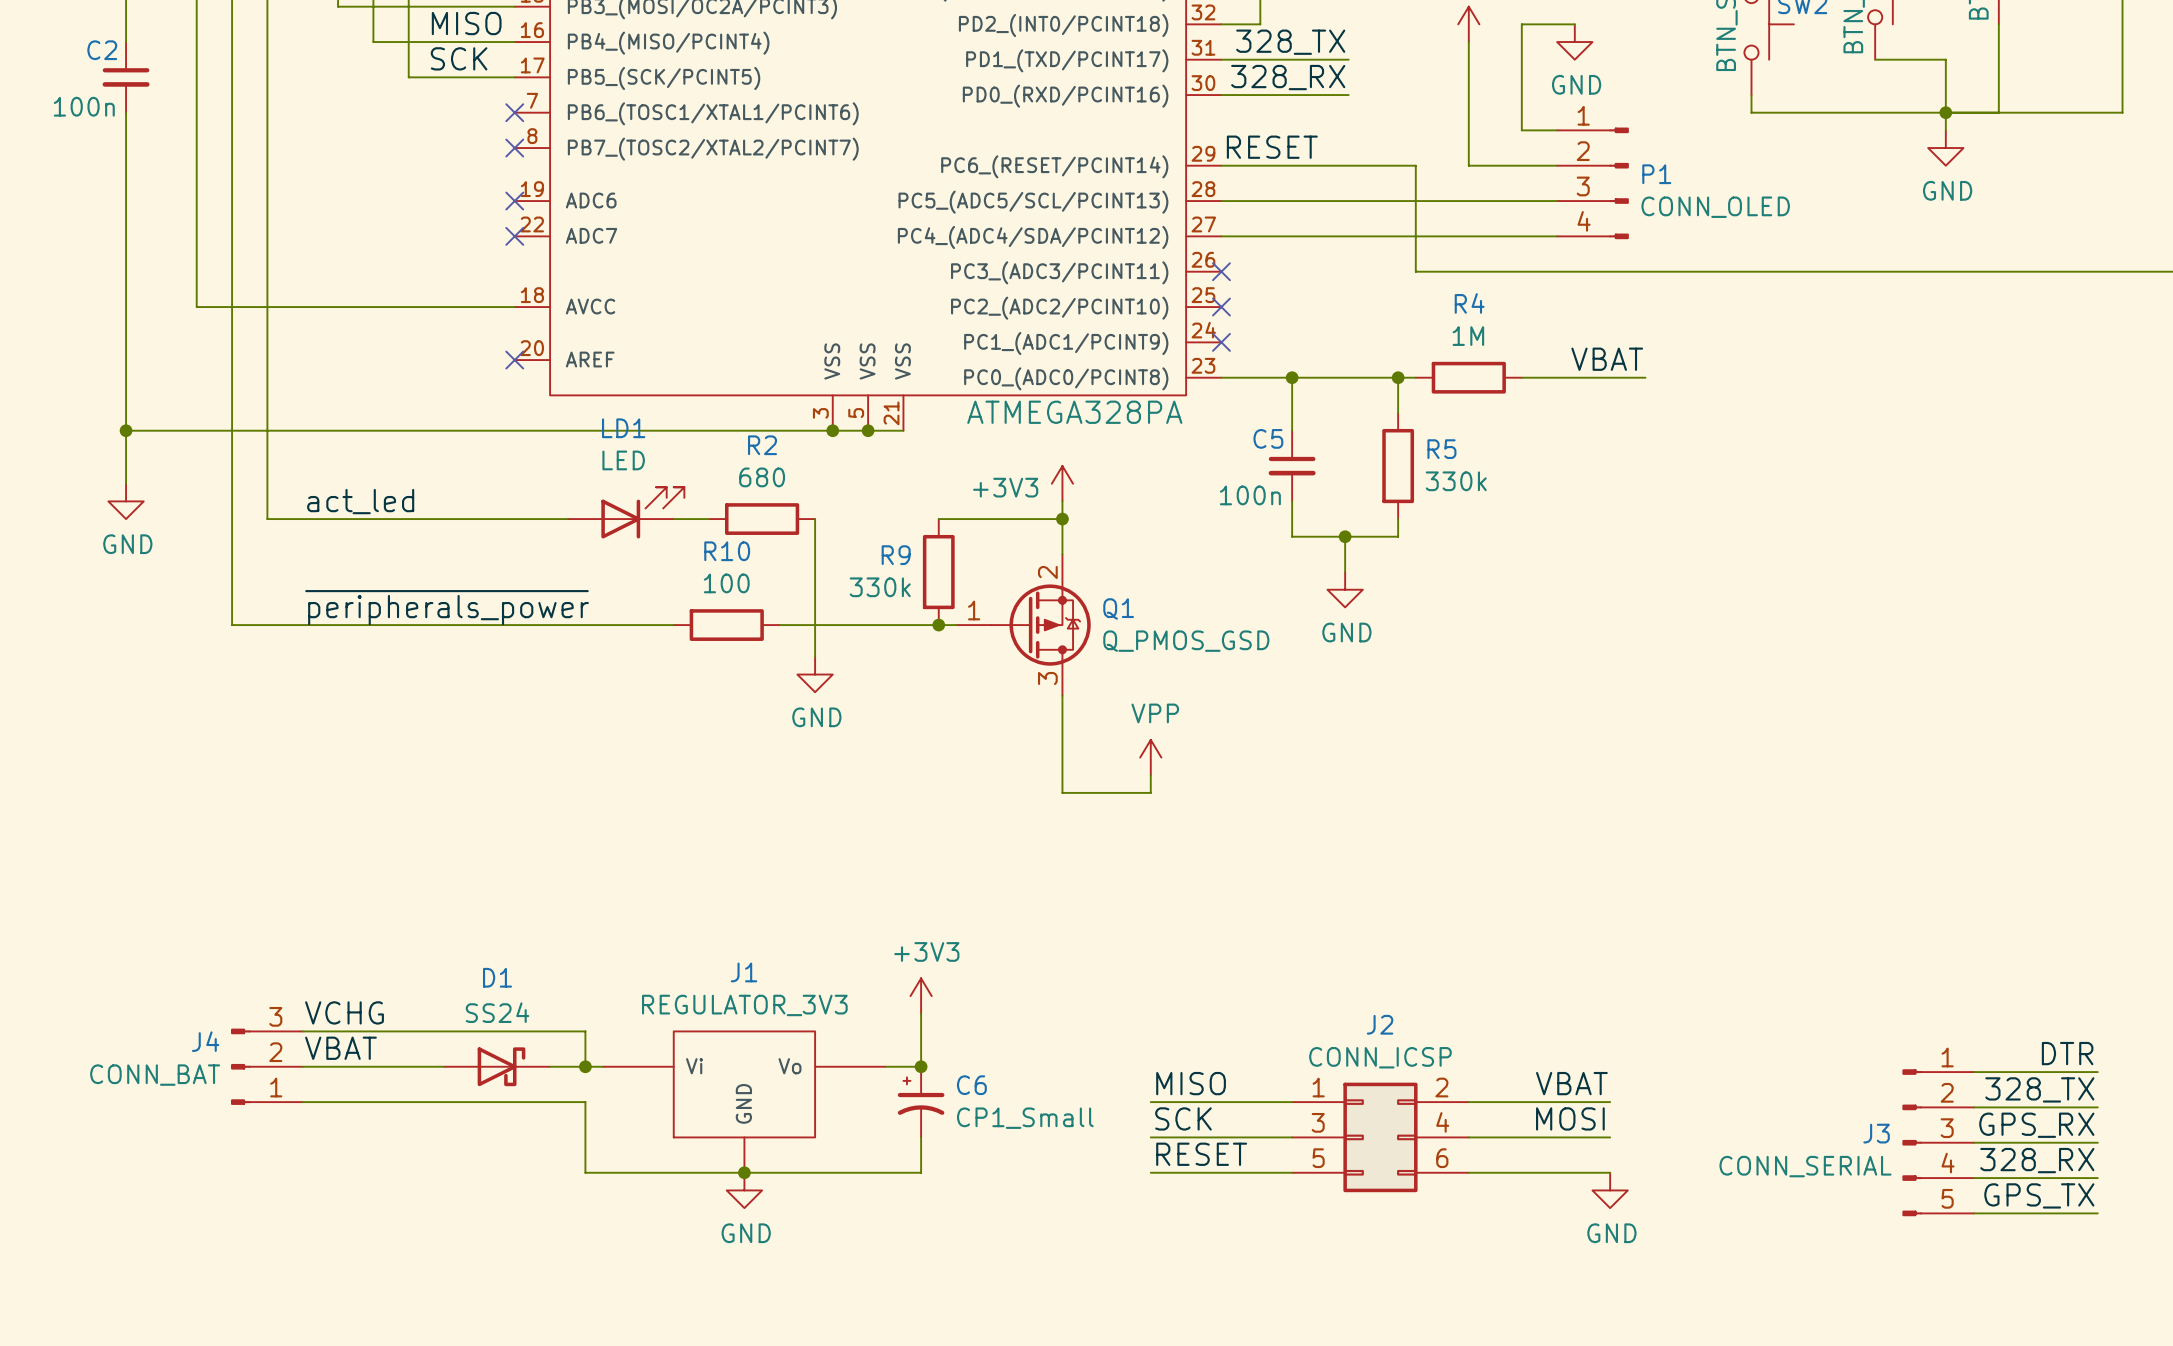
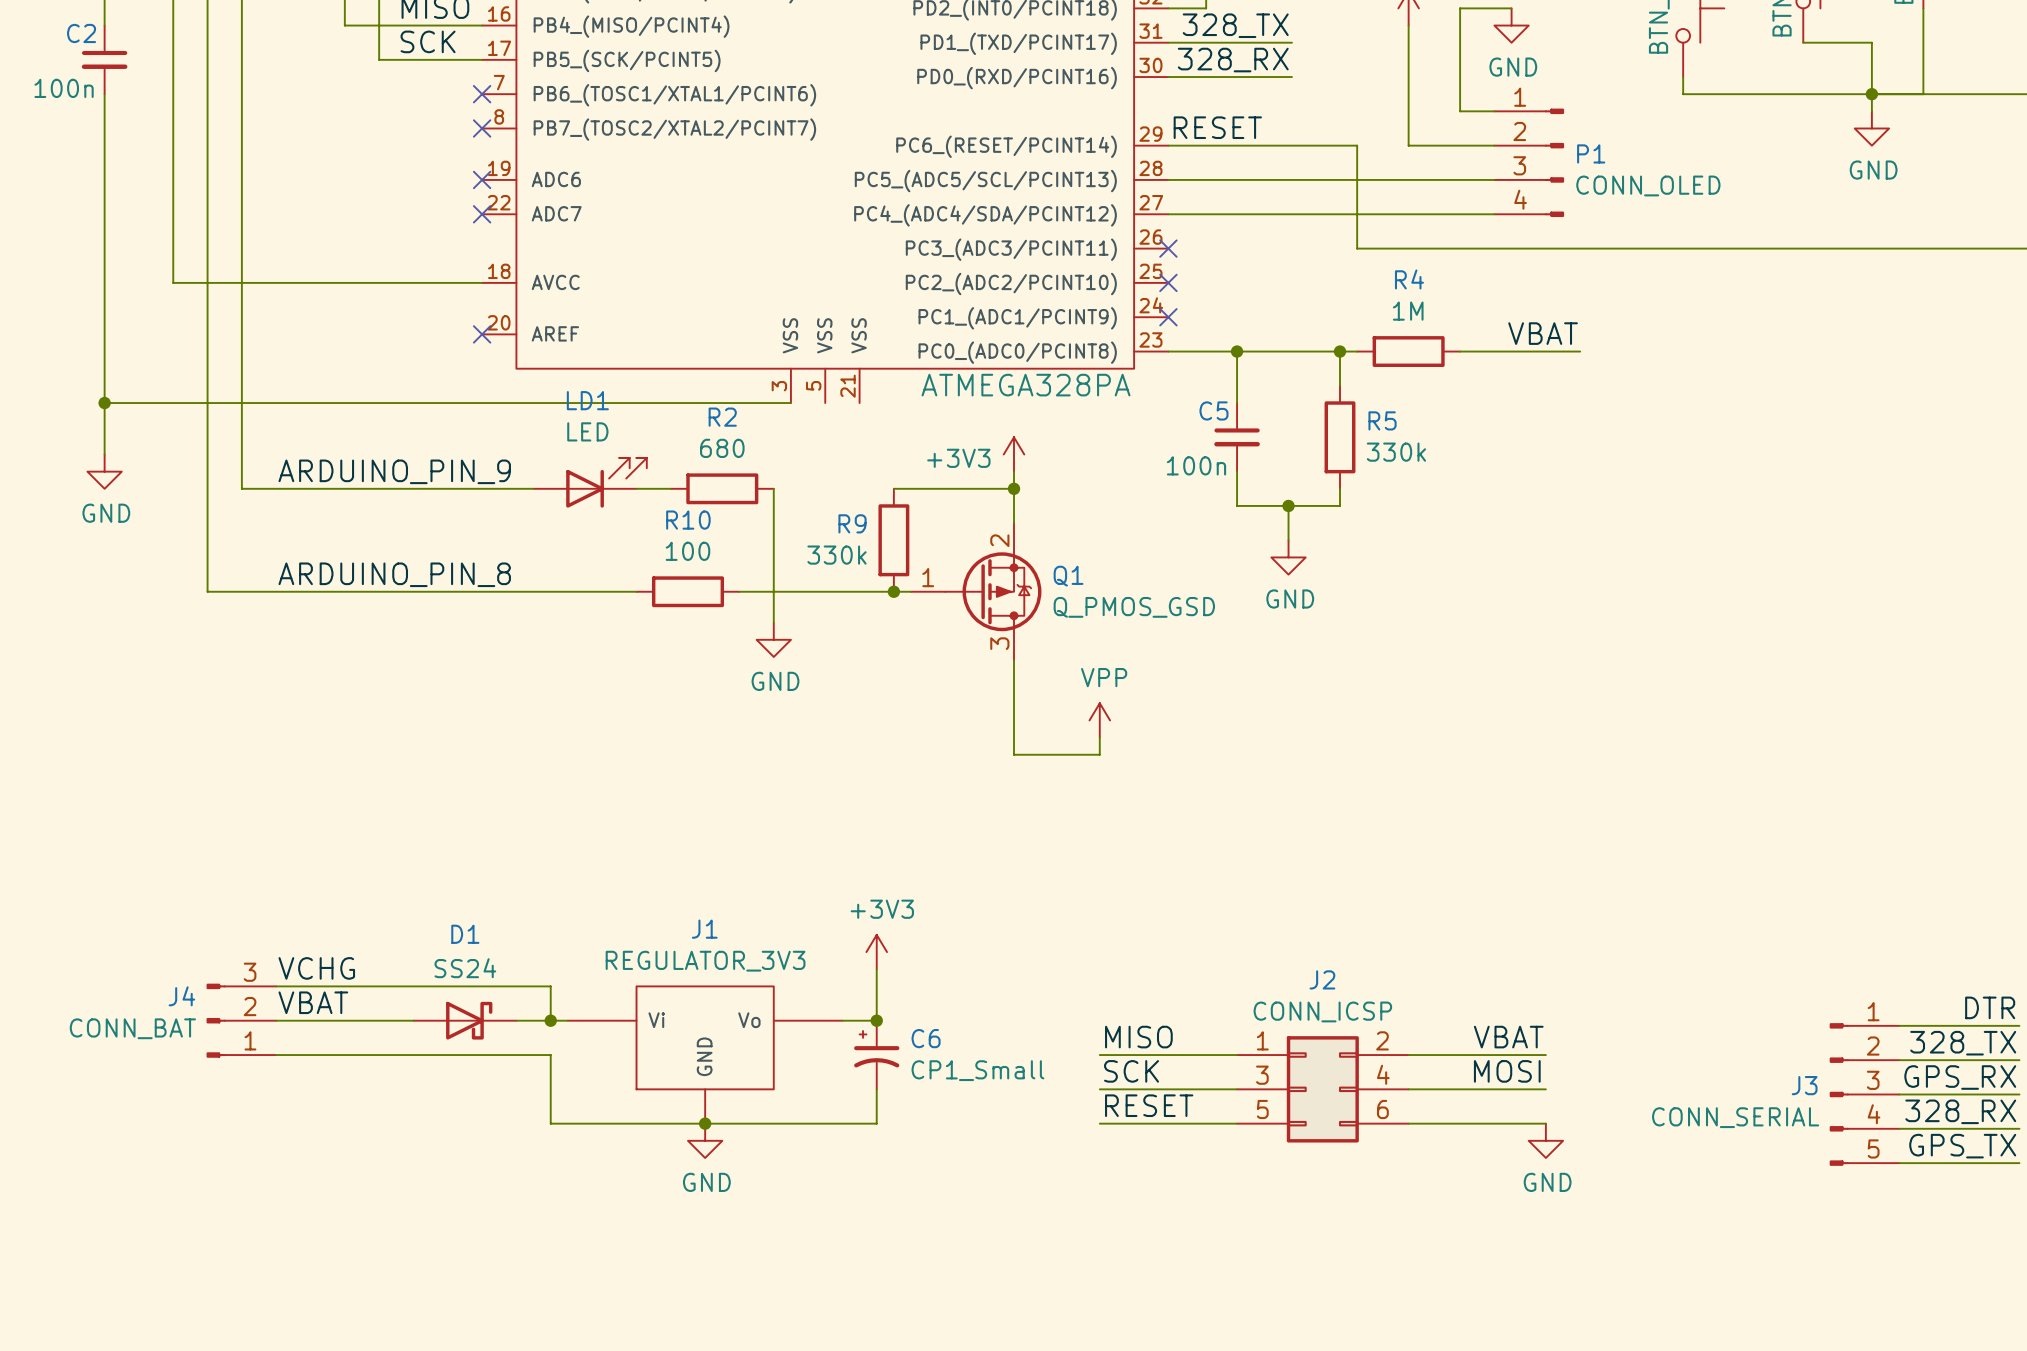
wire: (832, 430) (903, 430) -> none
junction: (832, 430) -> none
junction: (868, 430) -> none
label: act_led (360, 501) -> ARDUINO_PIN_9 (394, 471)
label: ~{peripherals_power} (447, 607) -> ARDUINO_PIN_8 (394, 574)

